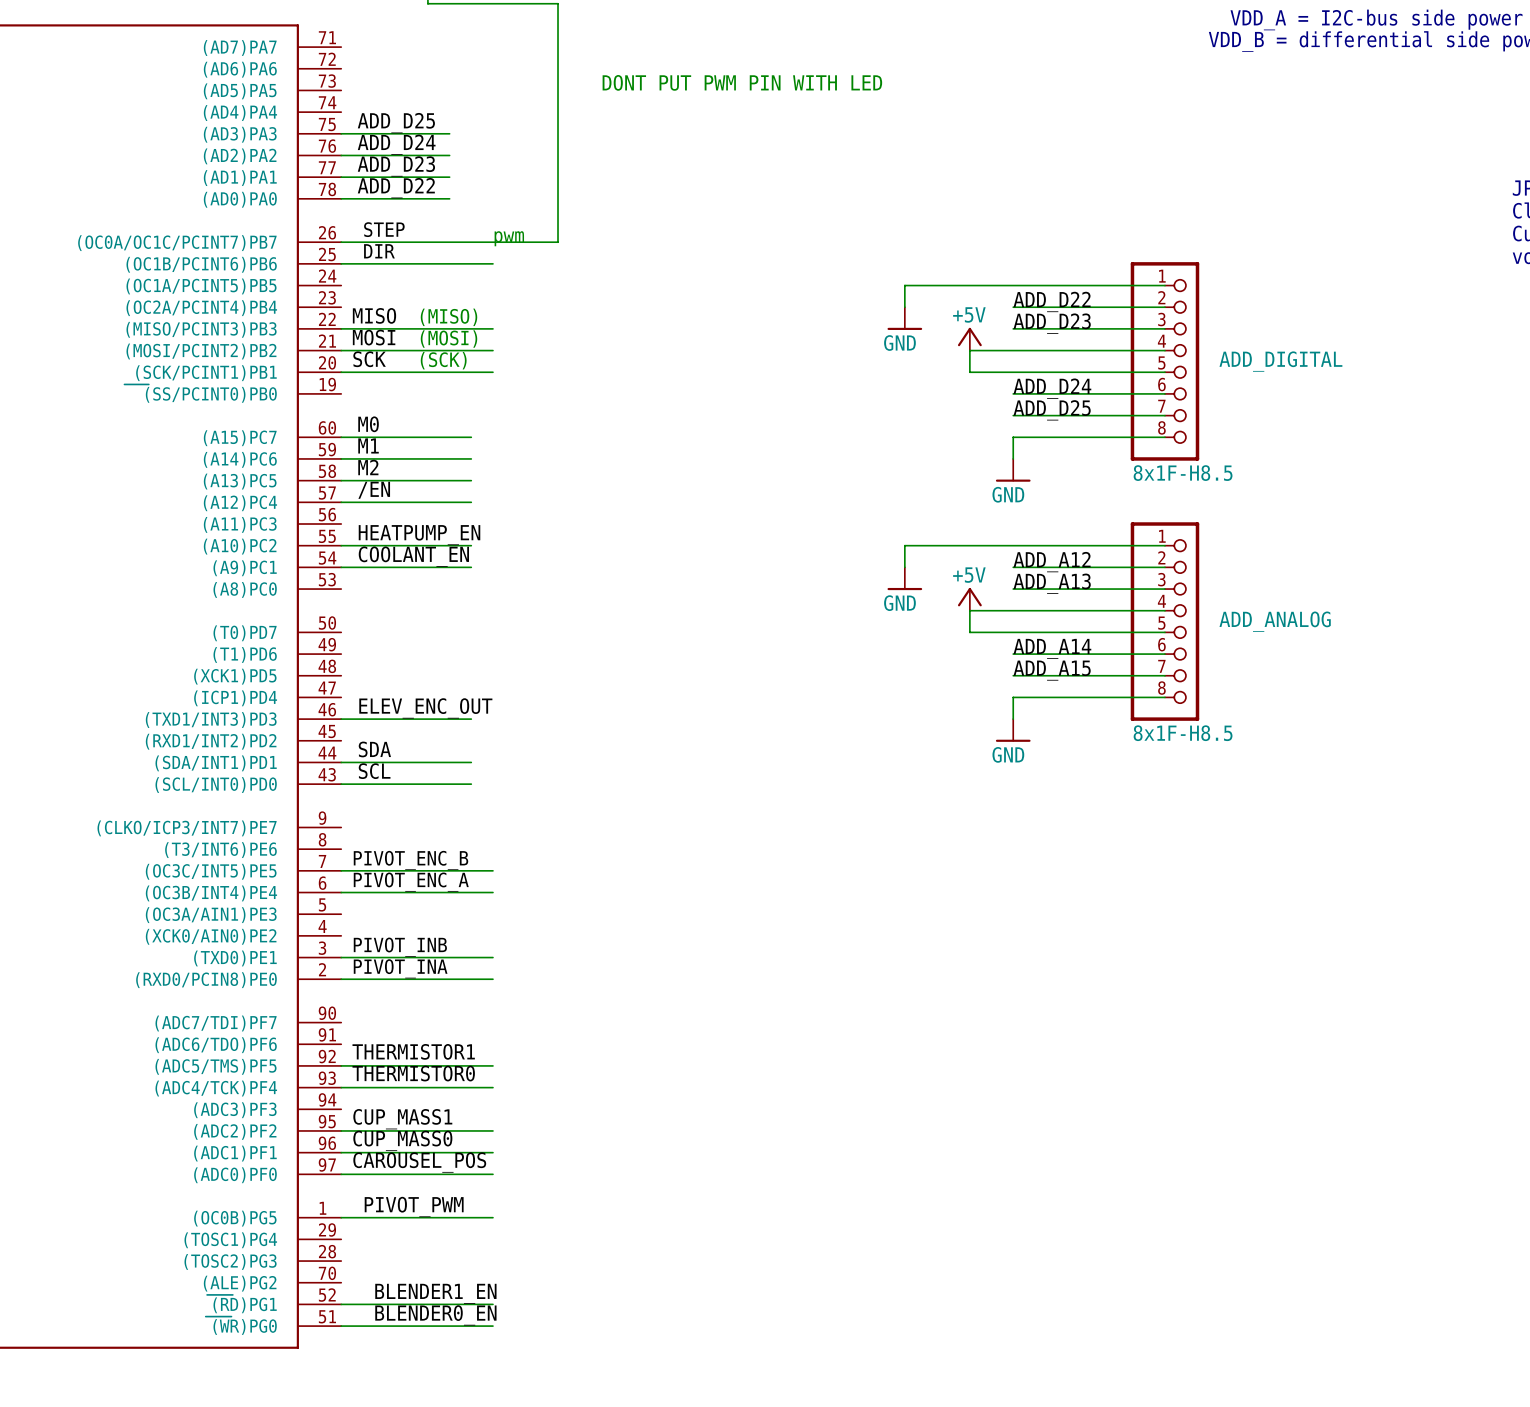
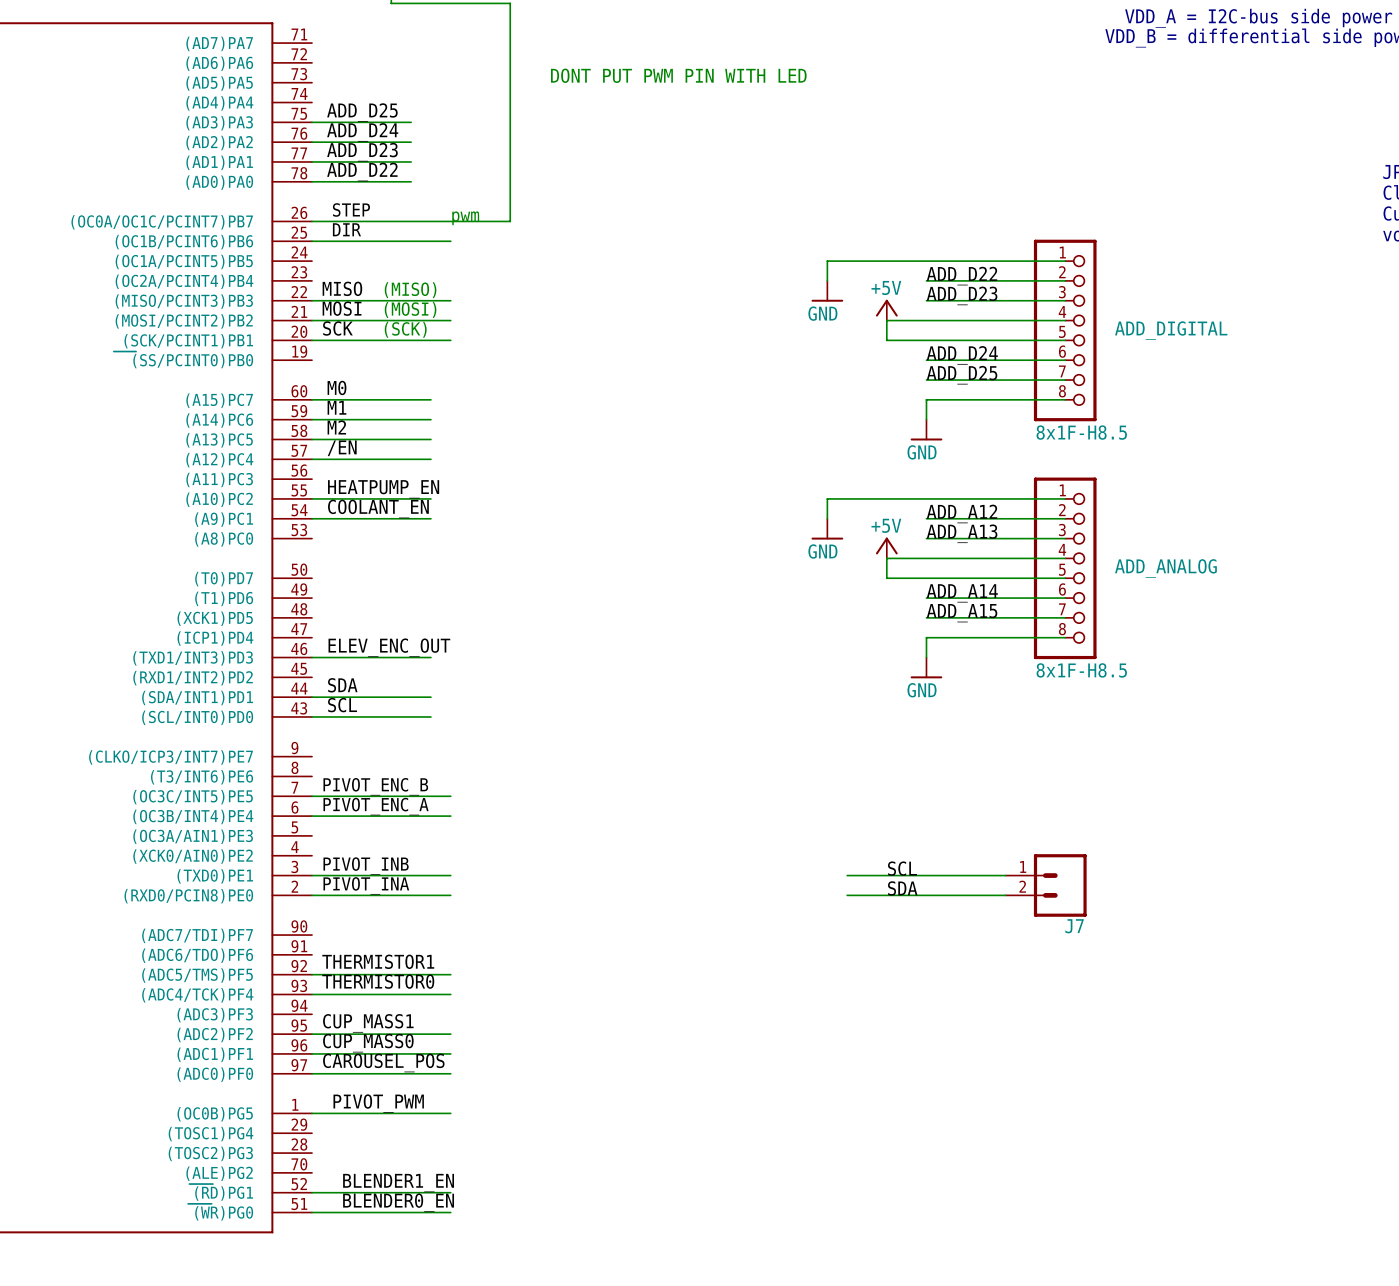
label: none -> SCL (902, 868)
wire: none -> (847, 875) (1005, 875)
J7: none -> (1046, 885)
label: none -> SDA (902, 888)
wire: none -> (847, 895) (1005, 895)

